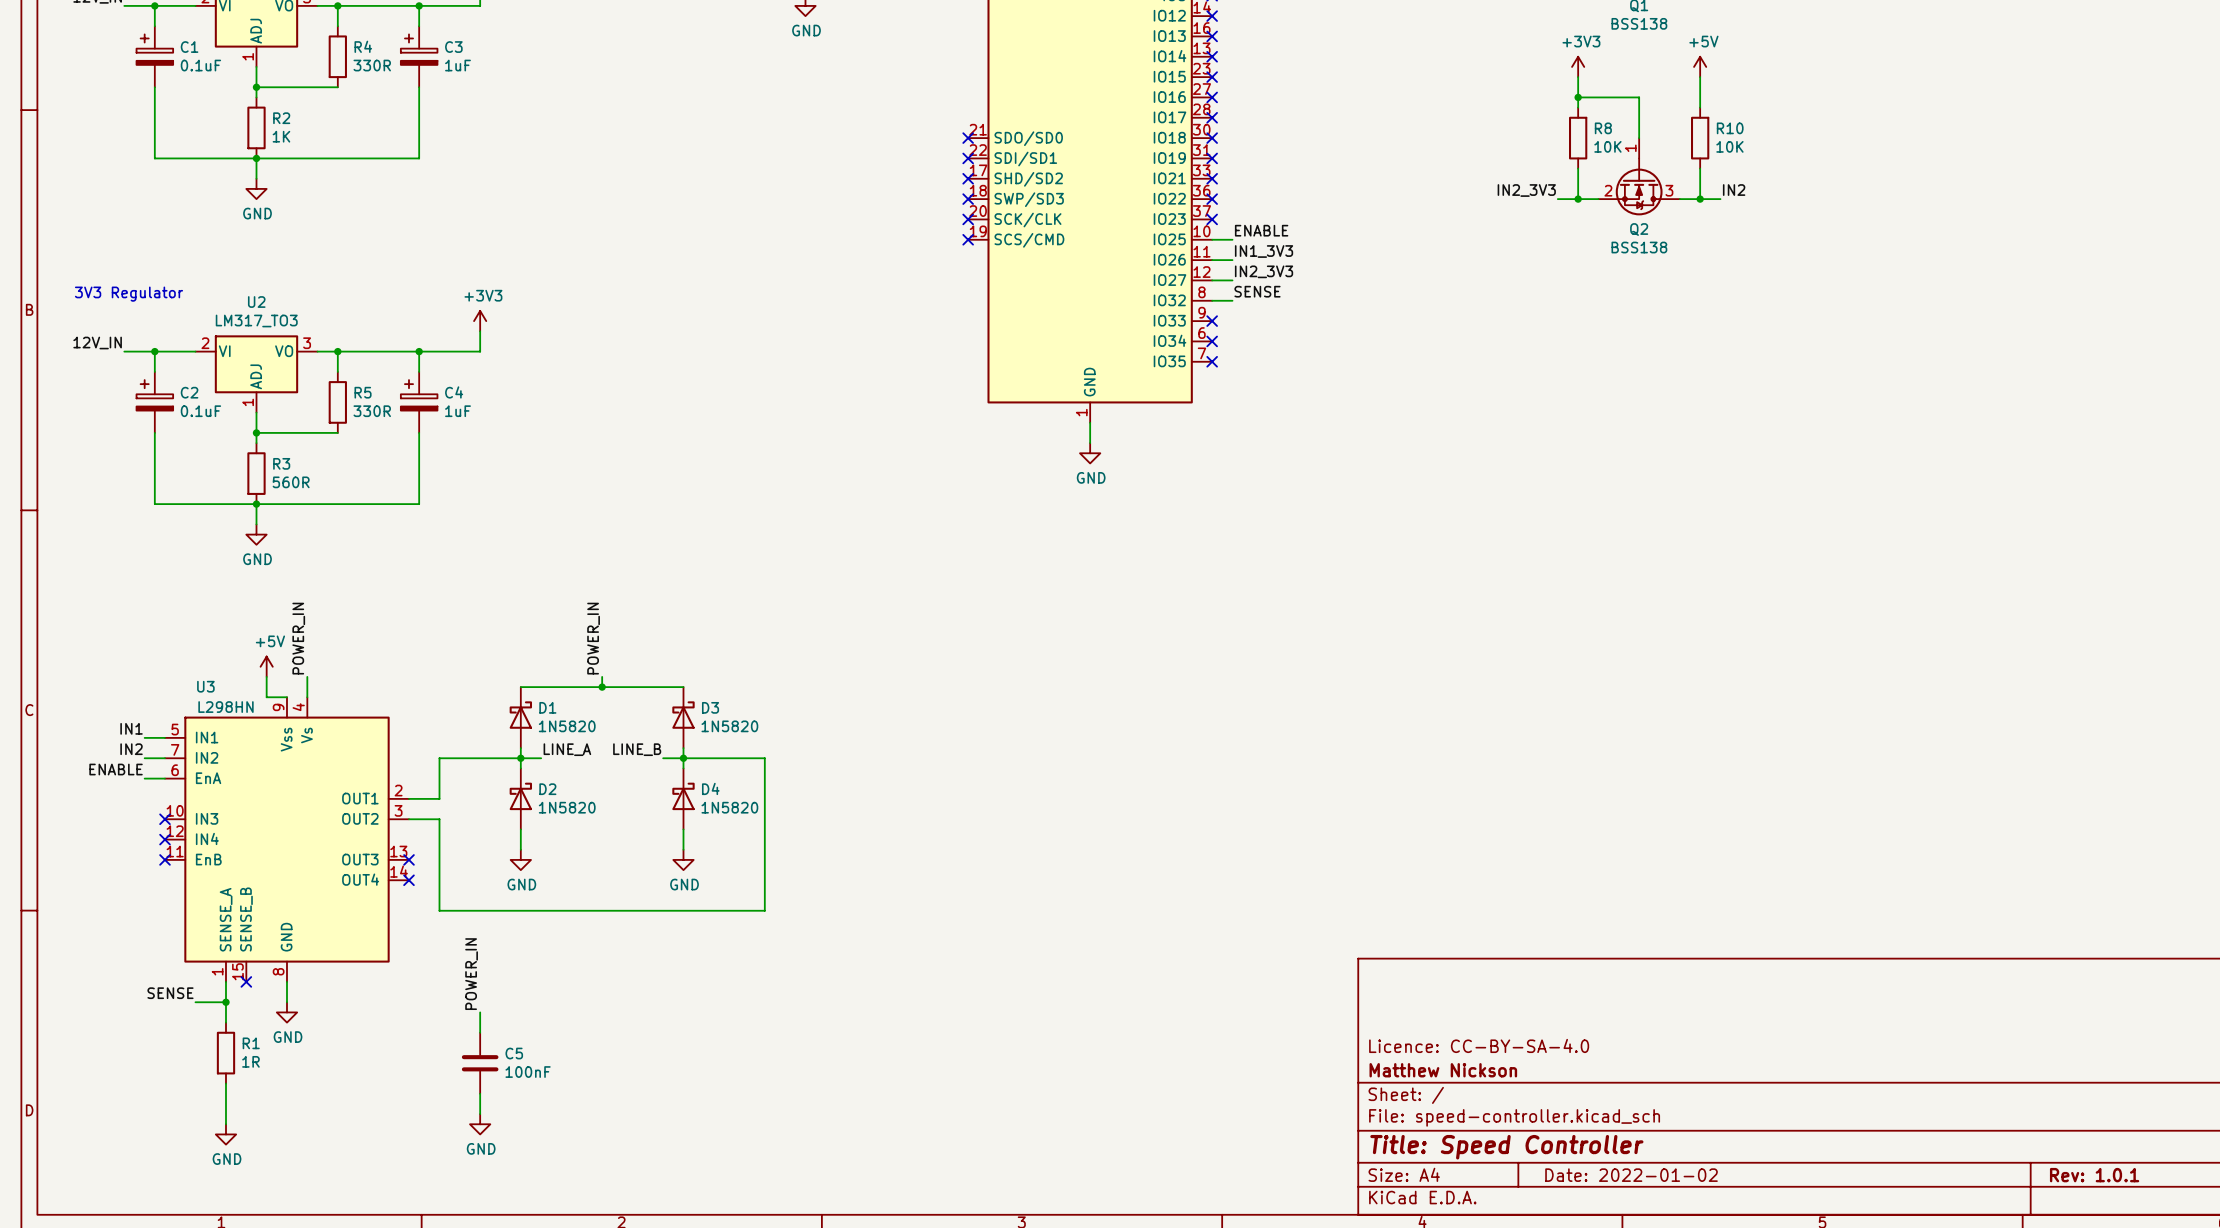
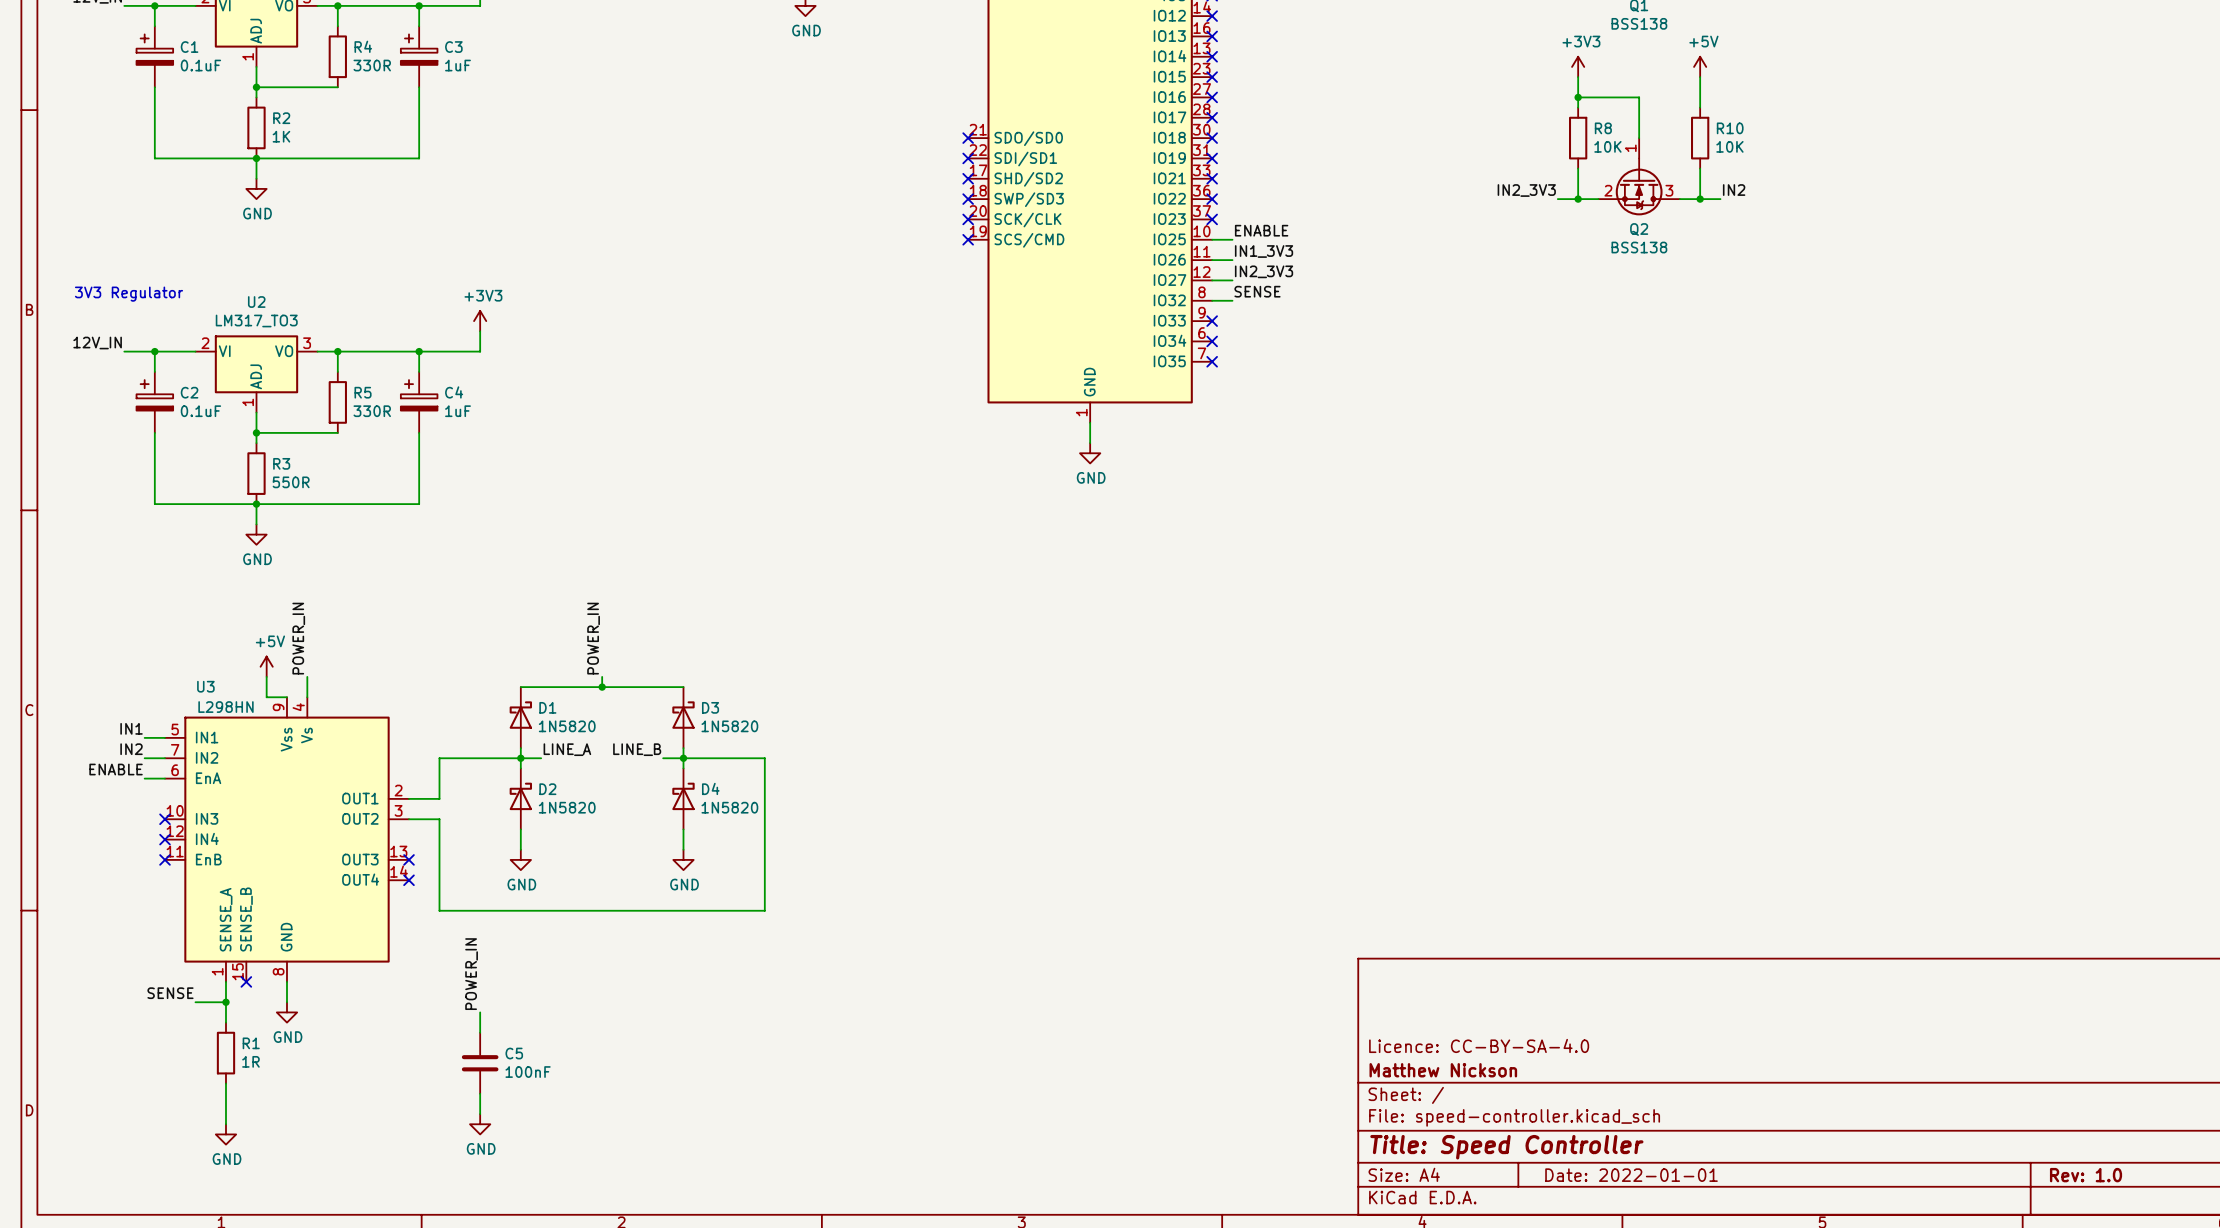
R3 value: 560R (291, 482) -> 550R (291, 482)
title block: Date: 2022-01-02 (1631, 1175) -> Date: 2022-01-01 (1631, 1175)
title block: Rev: 1.0.1 (2094, 1175) -> Rev: 1.0 (2086, 1175)

